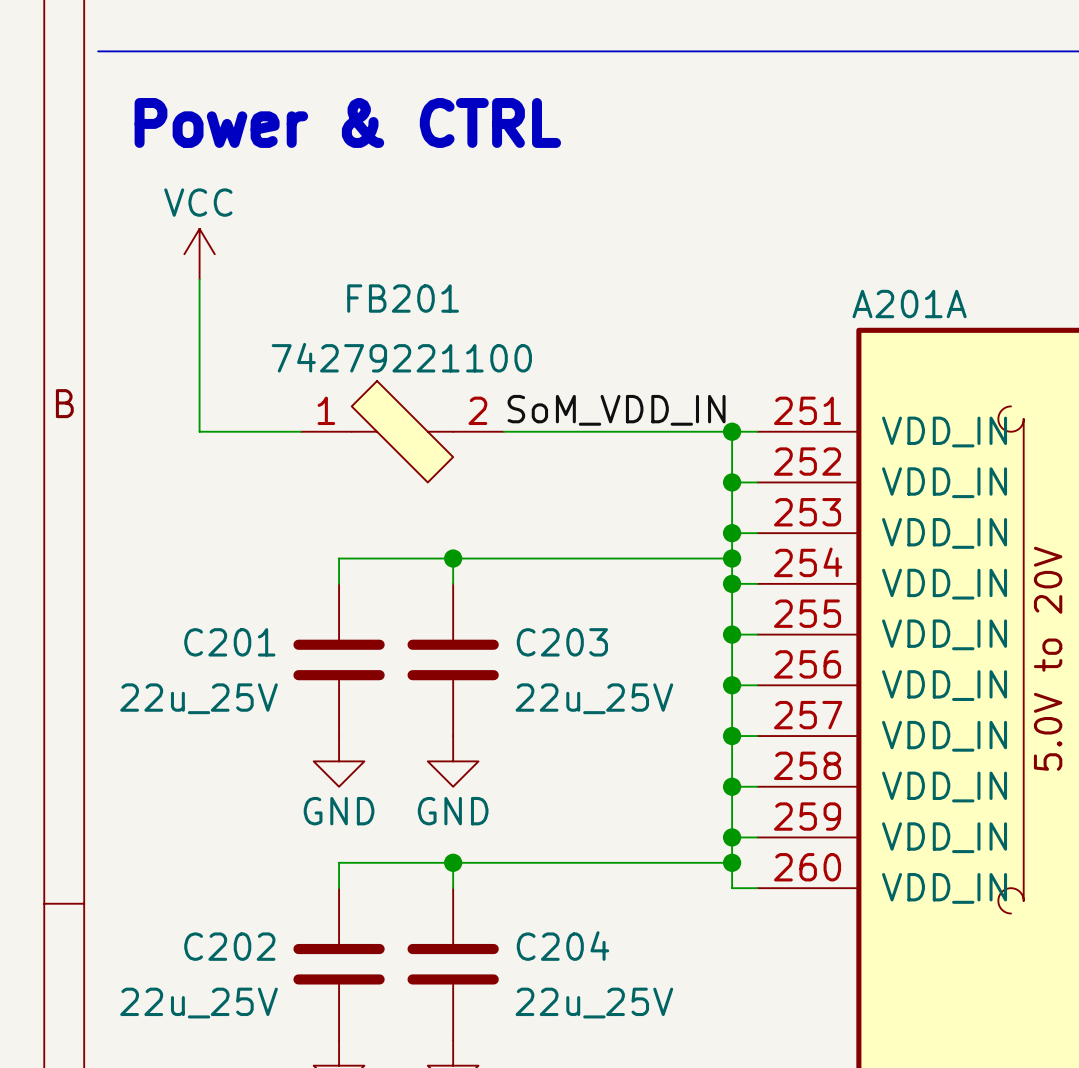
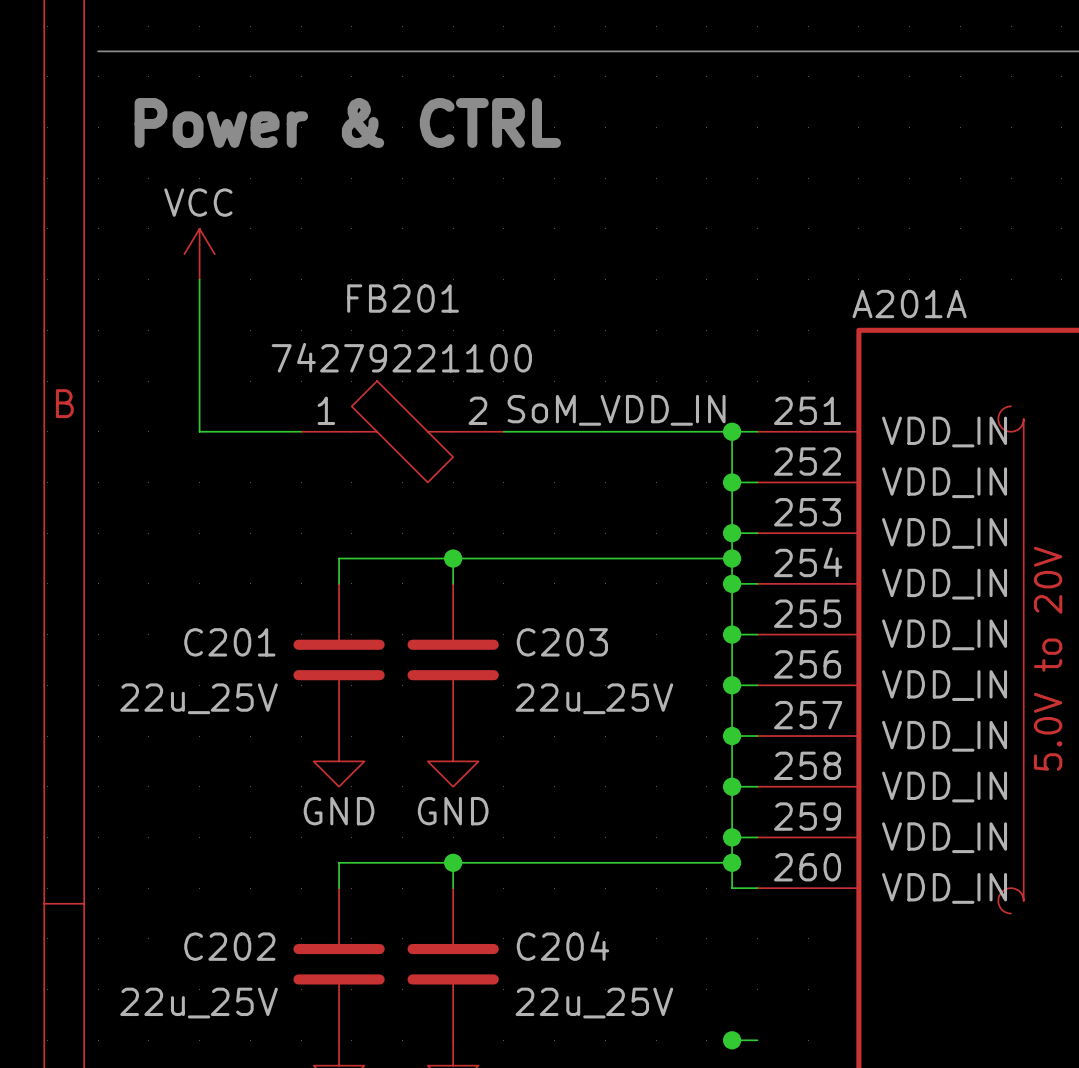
wire: none -> (732, 1040) (757, 1040)
junction: none -> (732, 1040)

